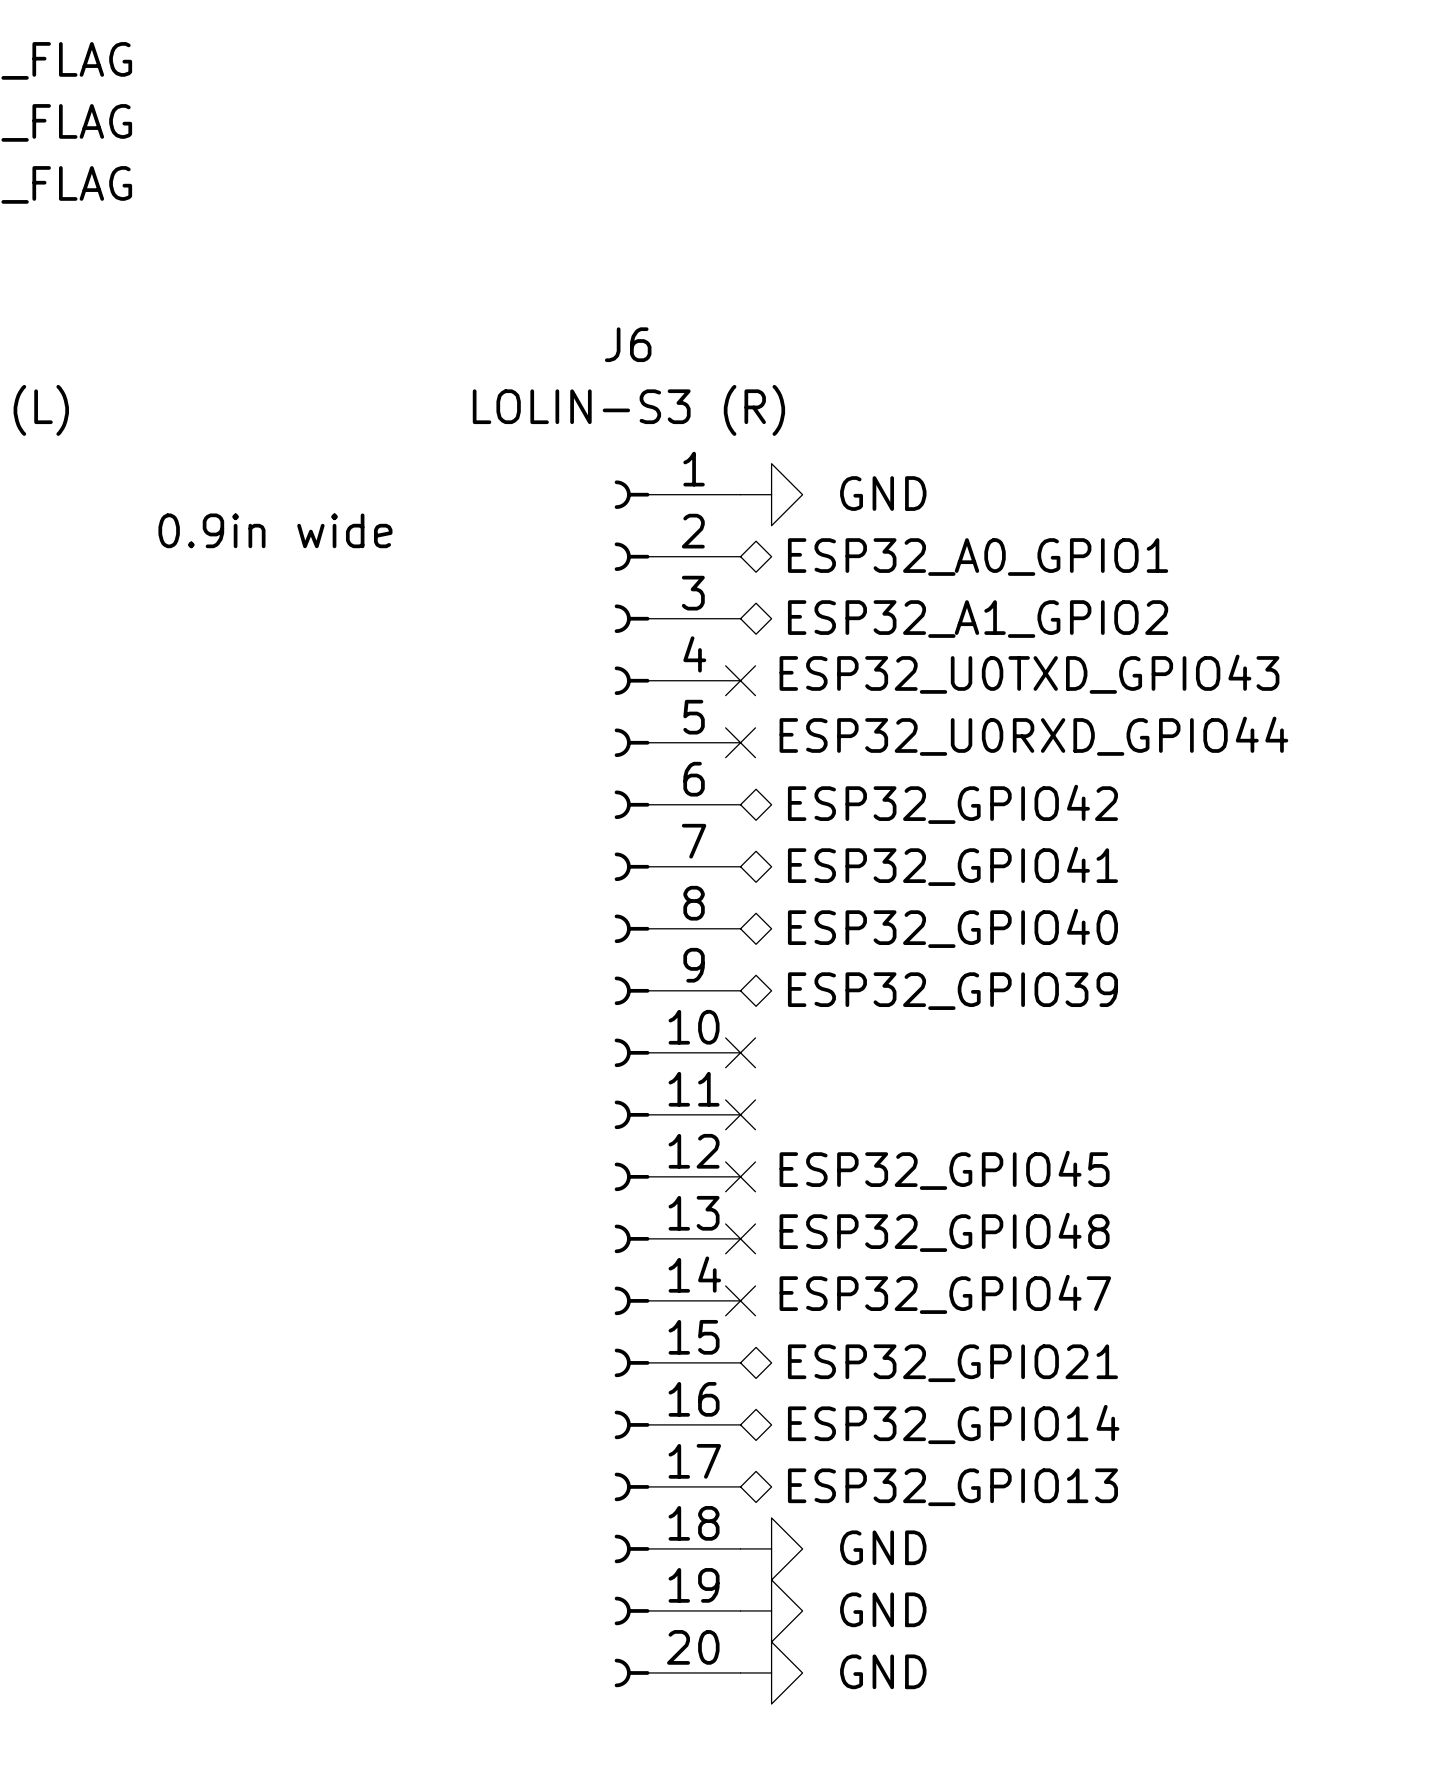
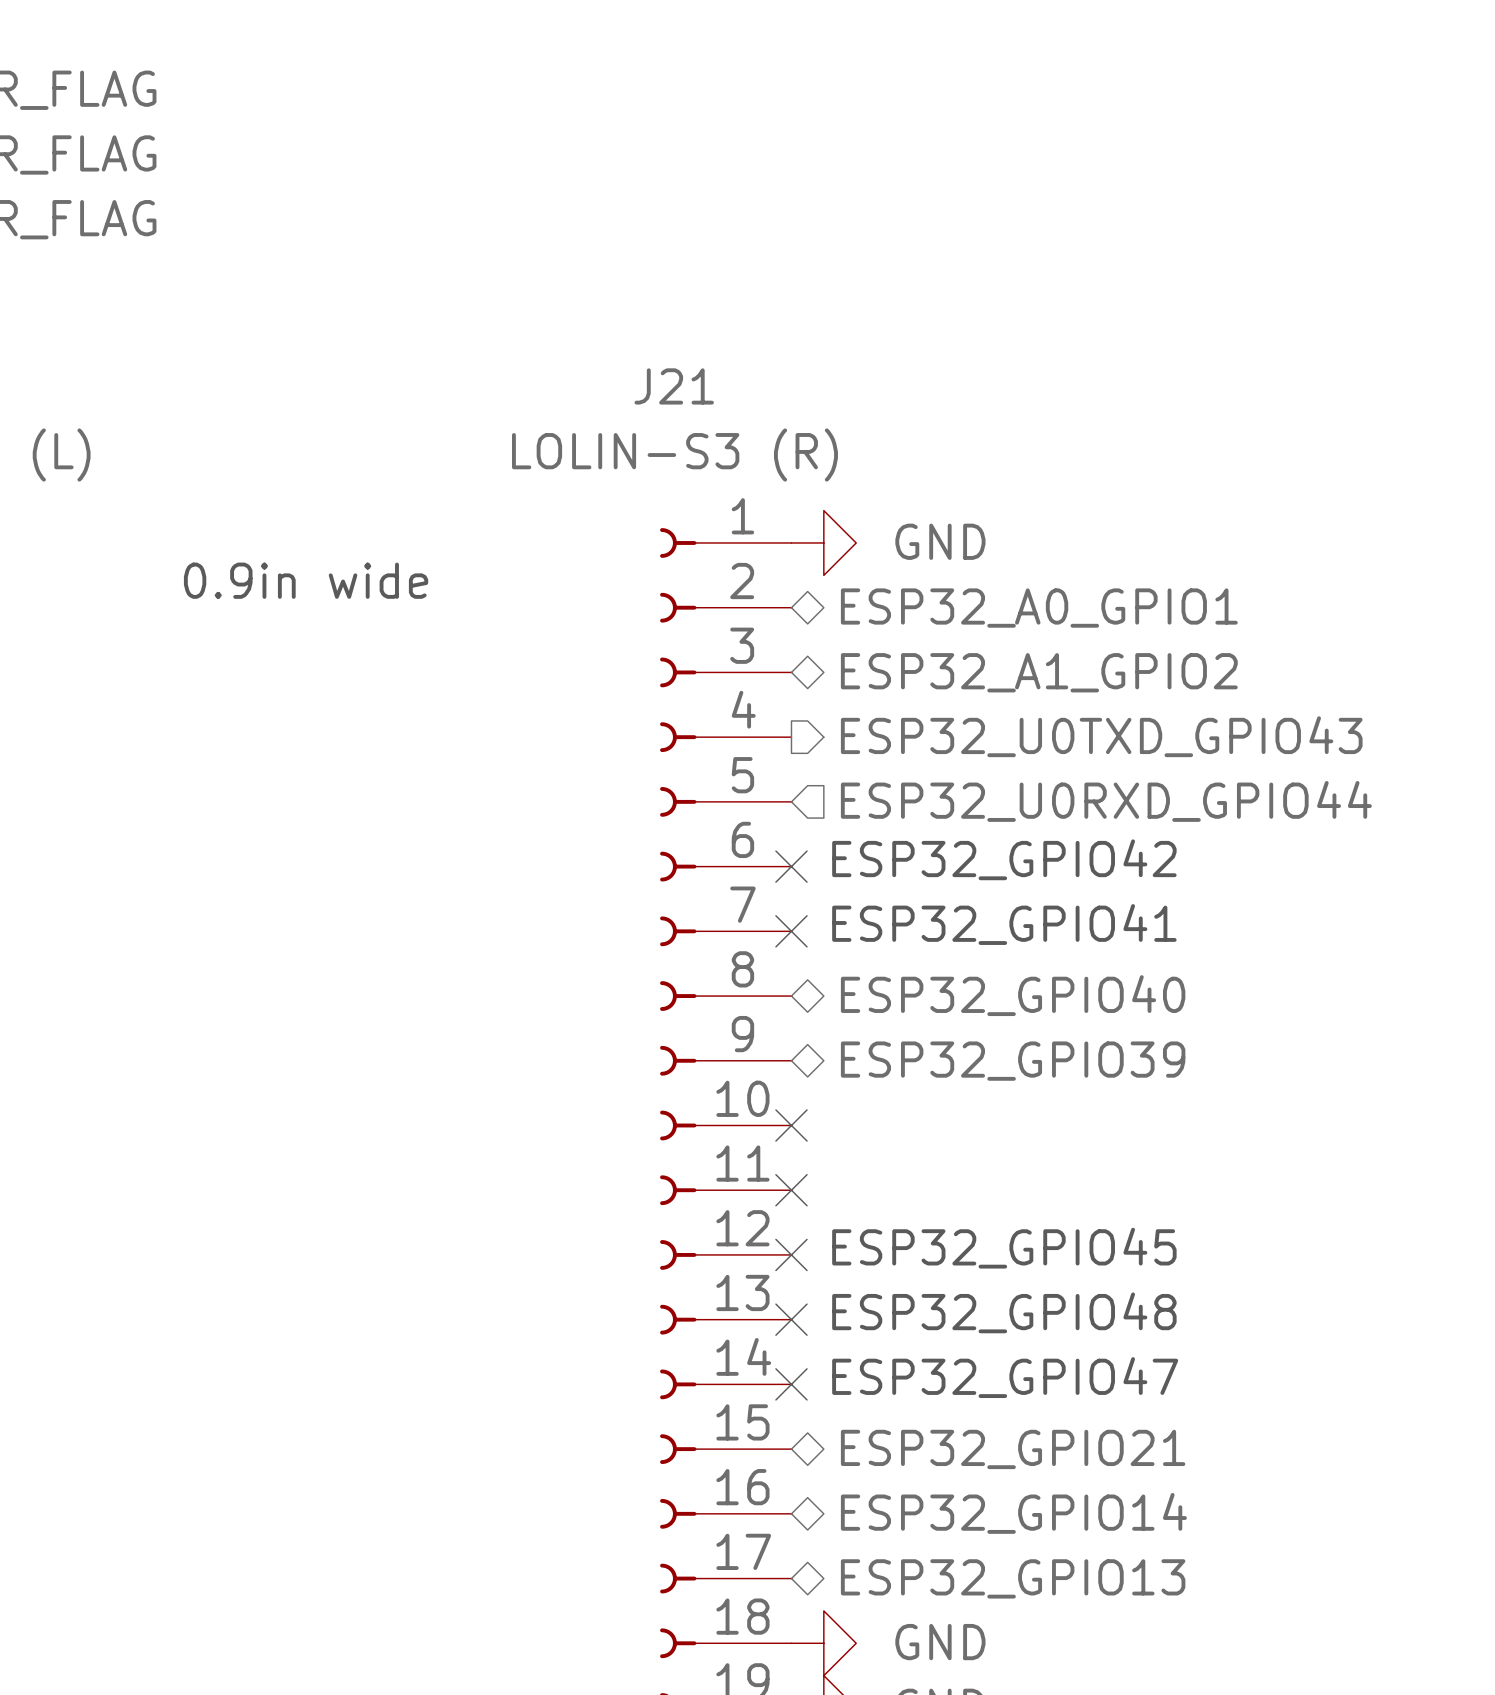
J6 name: J6 (628, 344) -> J21 (674, 386)
text: ESP32_U0TXD_GPIO43 (1029, 674) -> none
no-connect mark: (740, 680) -> none
hierarchical label: none -> ESP32_U0TXD_GPIO43 (1101, 736)
text: ESP32_U0RXD_GPIO44 (1033, 736) -> ESP32_GPIO42 (1004, 859)
no-connect mark: (740, 742) -> none
no-connect mark: none -> (791, 866)
hierarchical label shape: bidirectional (952, 804) -> input (1106, 801)
hierarchical label: ESP32_GPIO42 (952, 804) -> ESP32_U0RXD_GPIO44 (1106, 801)
text: none -> ESP32_GPIO41 (1004, 924)
no-connect mark: none -> (791, 931)
hierarchical label: ESP32_GPIO41 (952, 866) -> none

